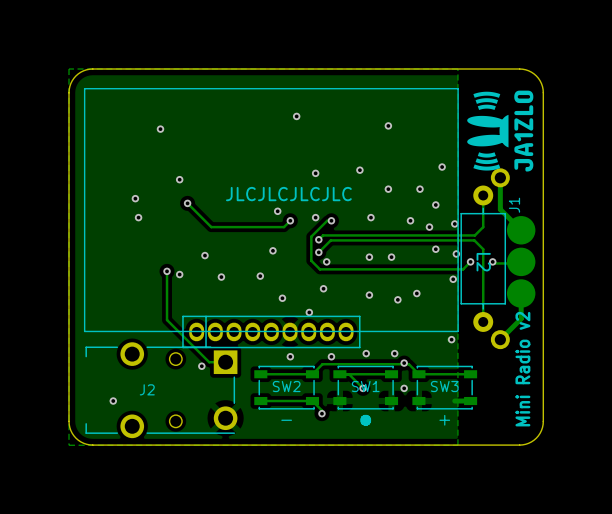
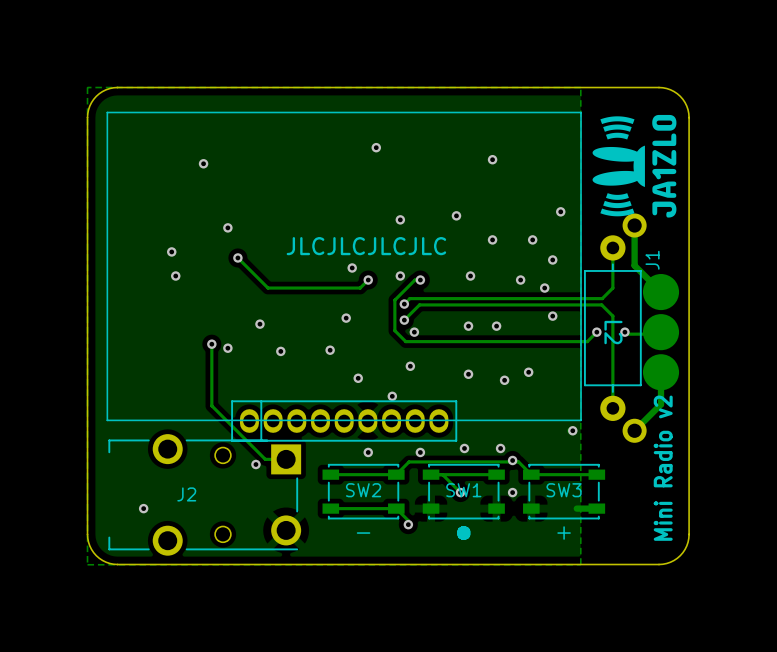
via: (454, 223) -> none
via: (456, 253) -> none
via: (453, 279) -> none

